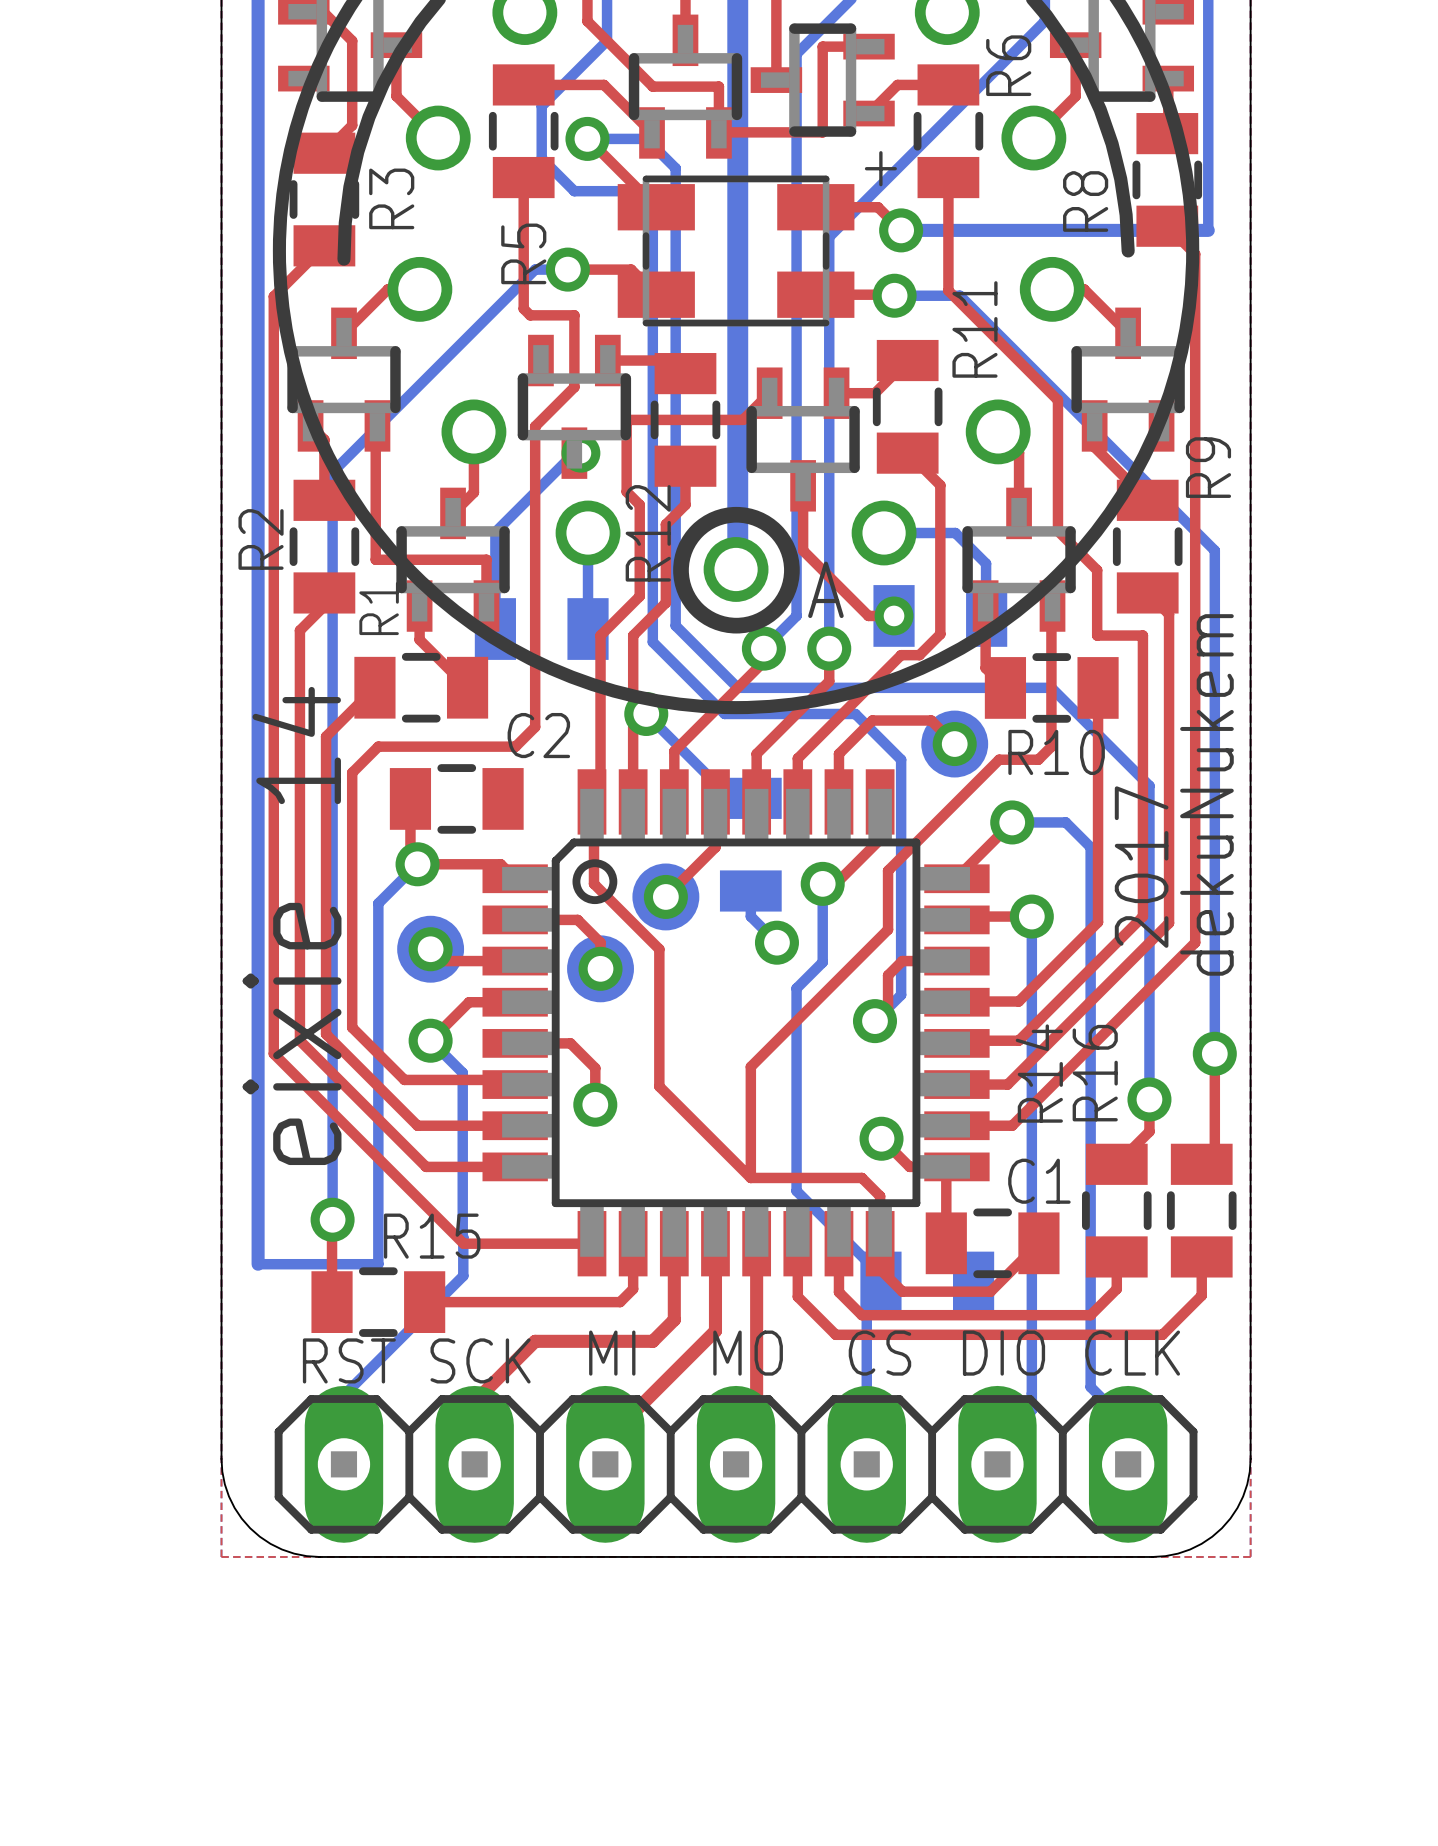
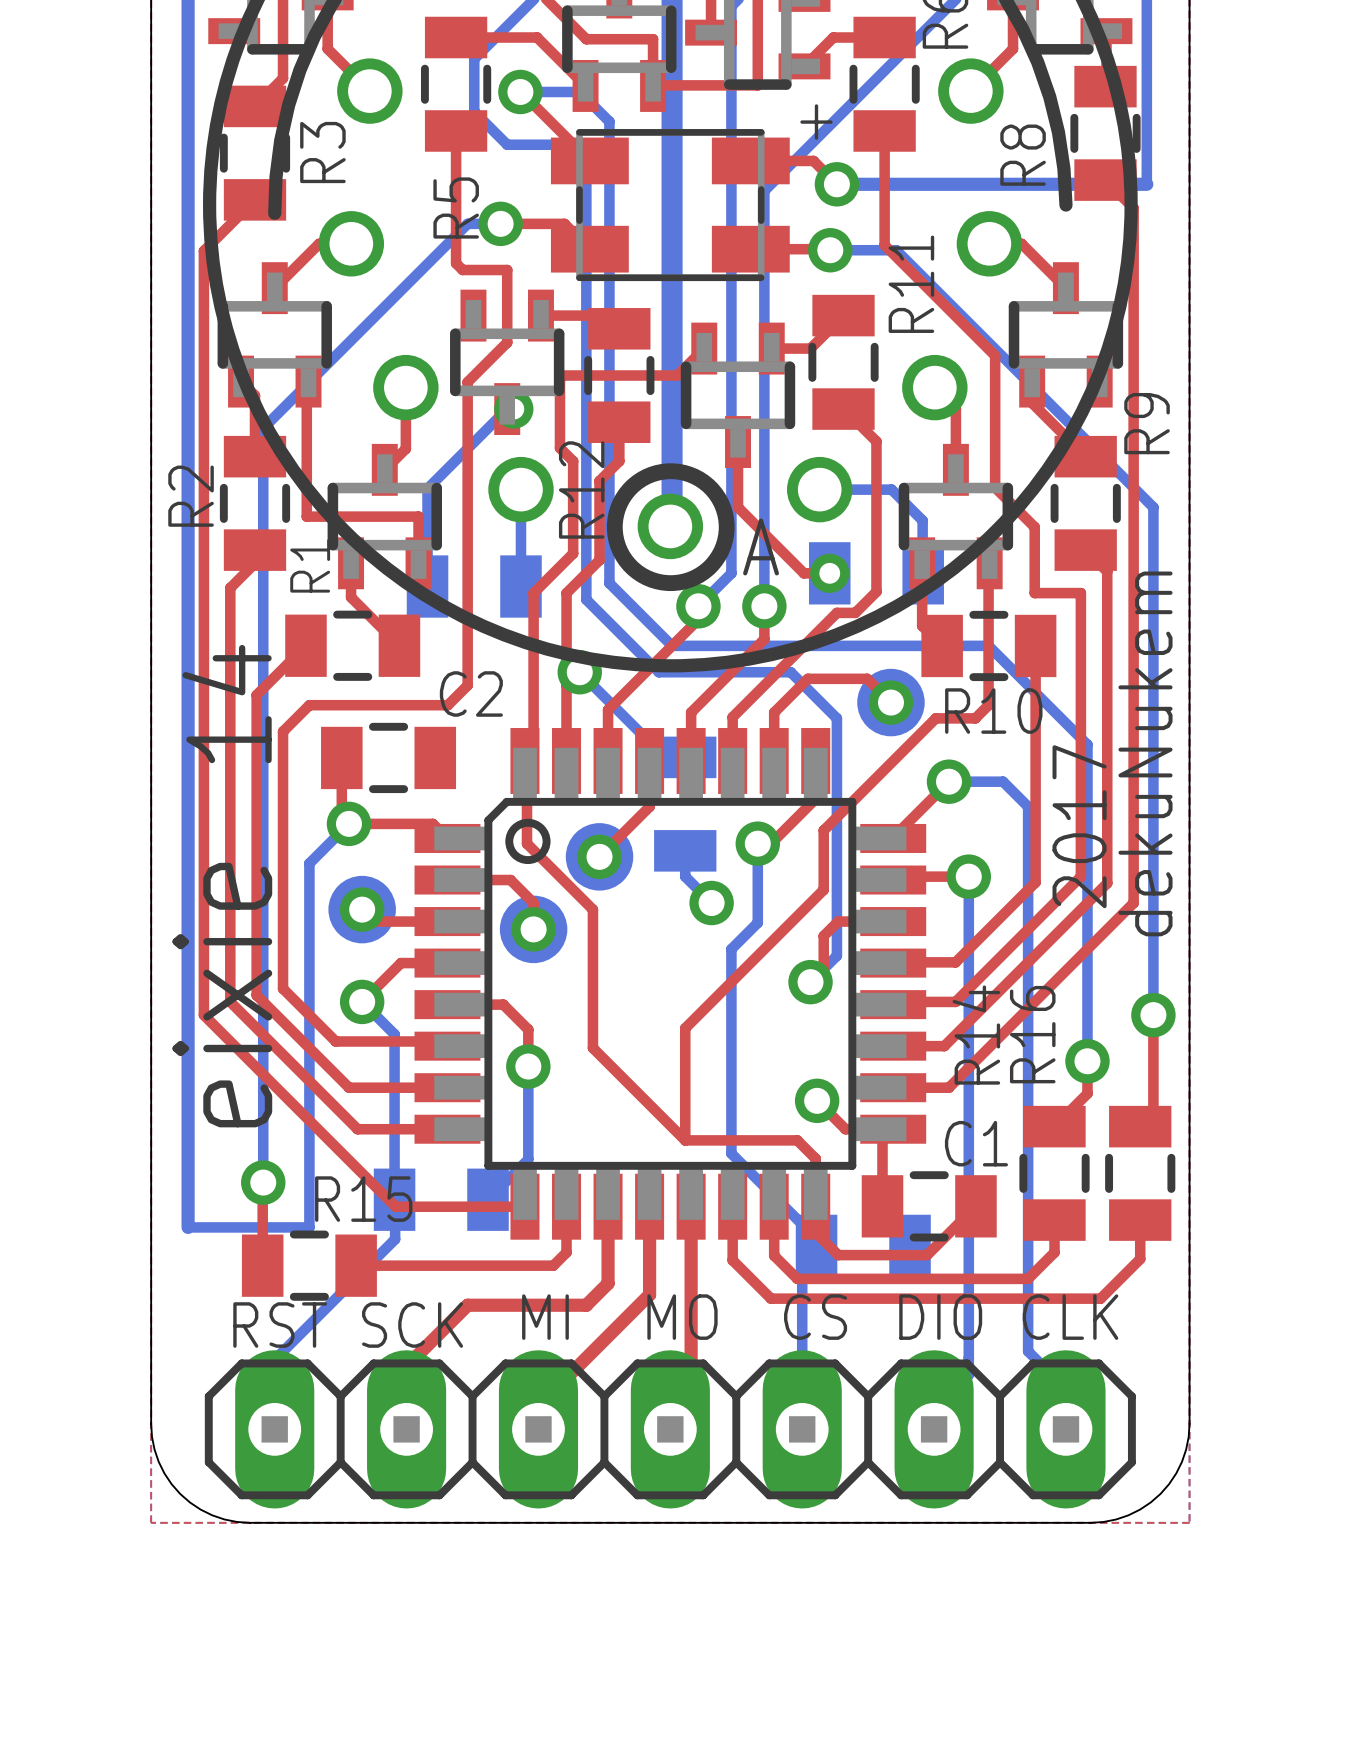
bottom track: none -> (528, 1066) (528, 1159) (488, 1199)
part: none -> (441, 1199)

